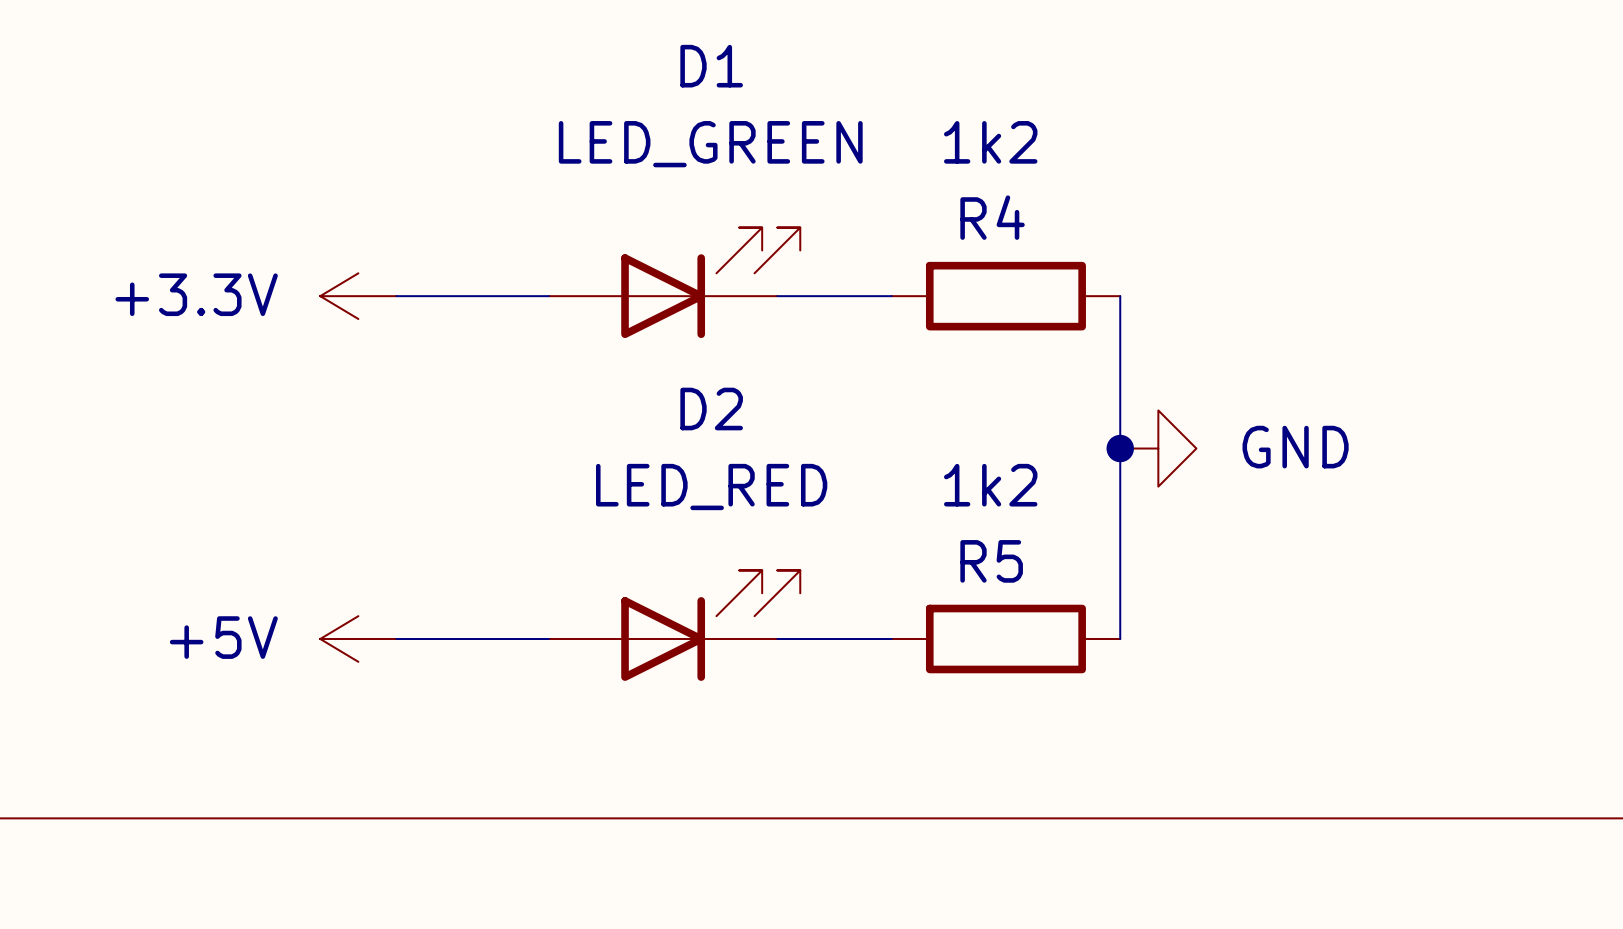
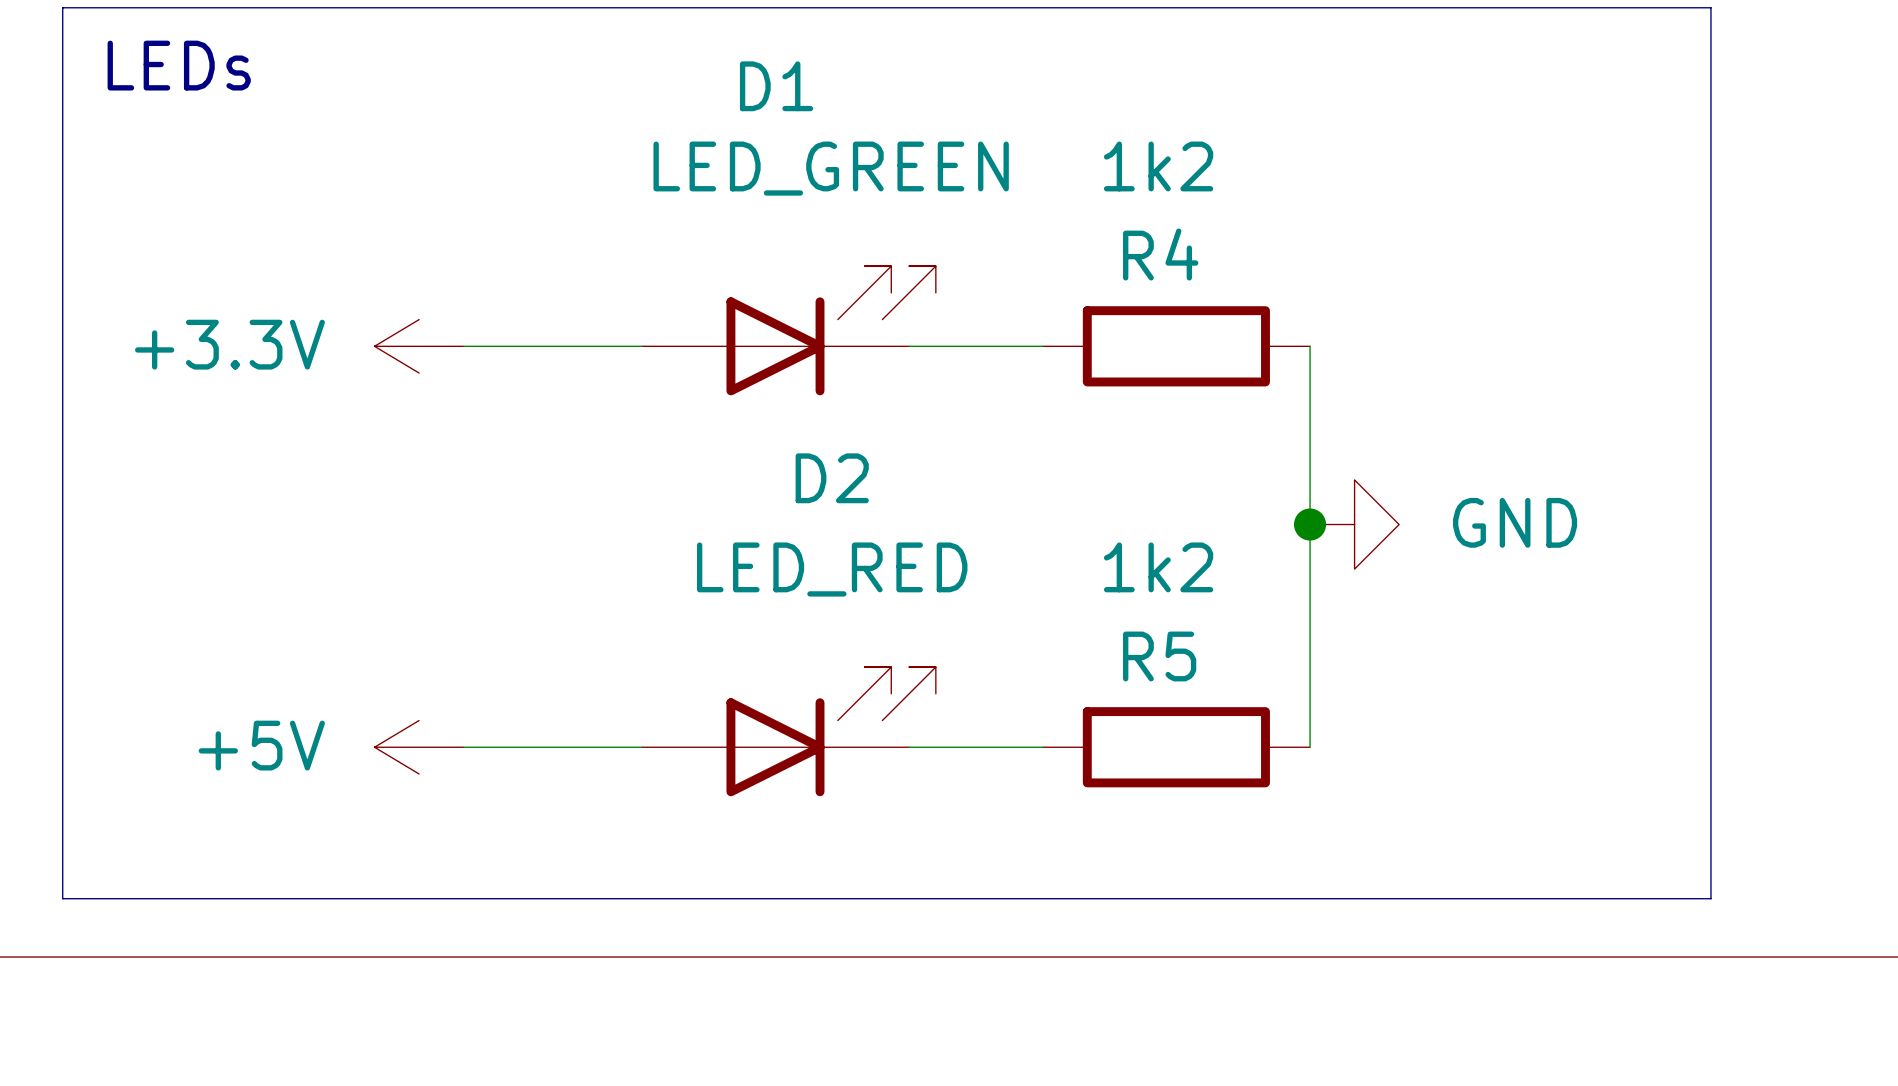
line: none -> (62, 7) (1710, 7) (1710, 898) (62, 898) (62, 7)
text: none -> LEDs (179, 65)
D1 name position: D1 (711, 66) -> D1 (776, 86)

